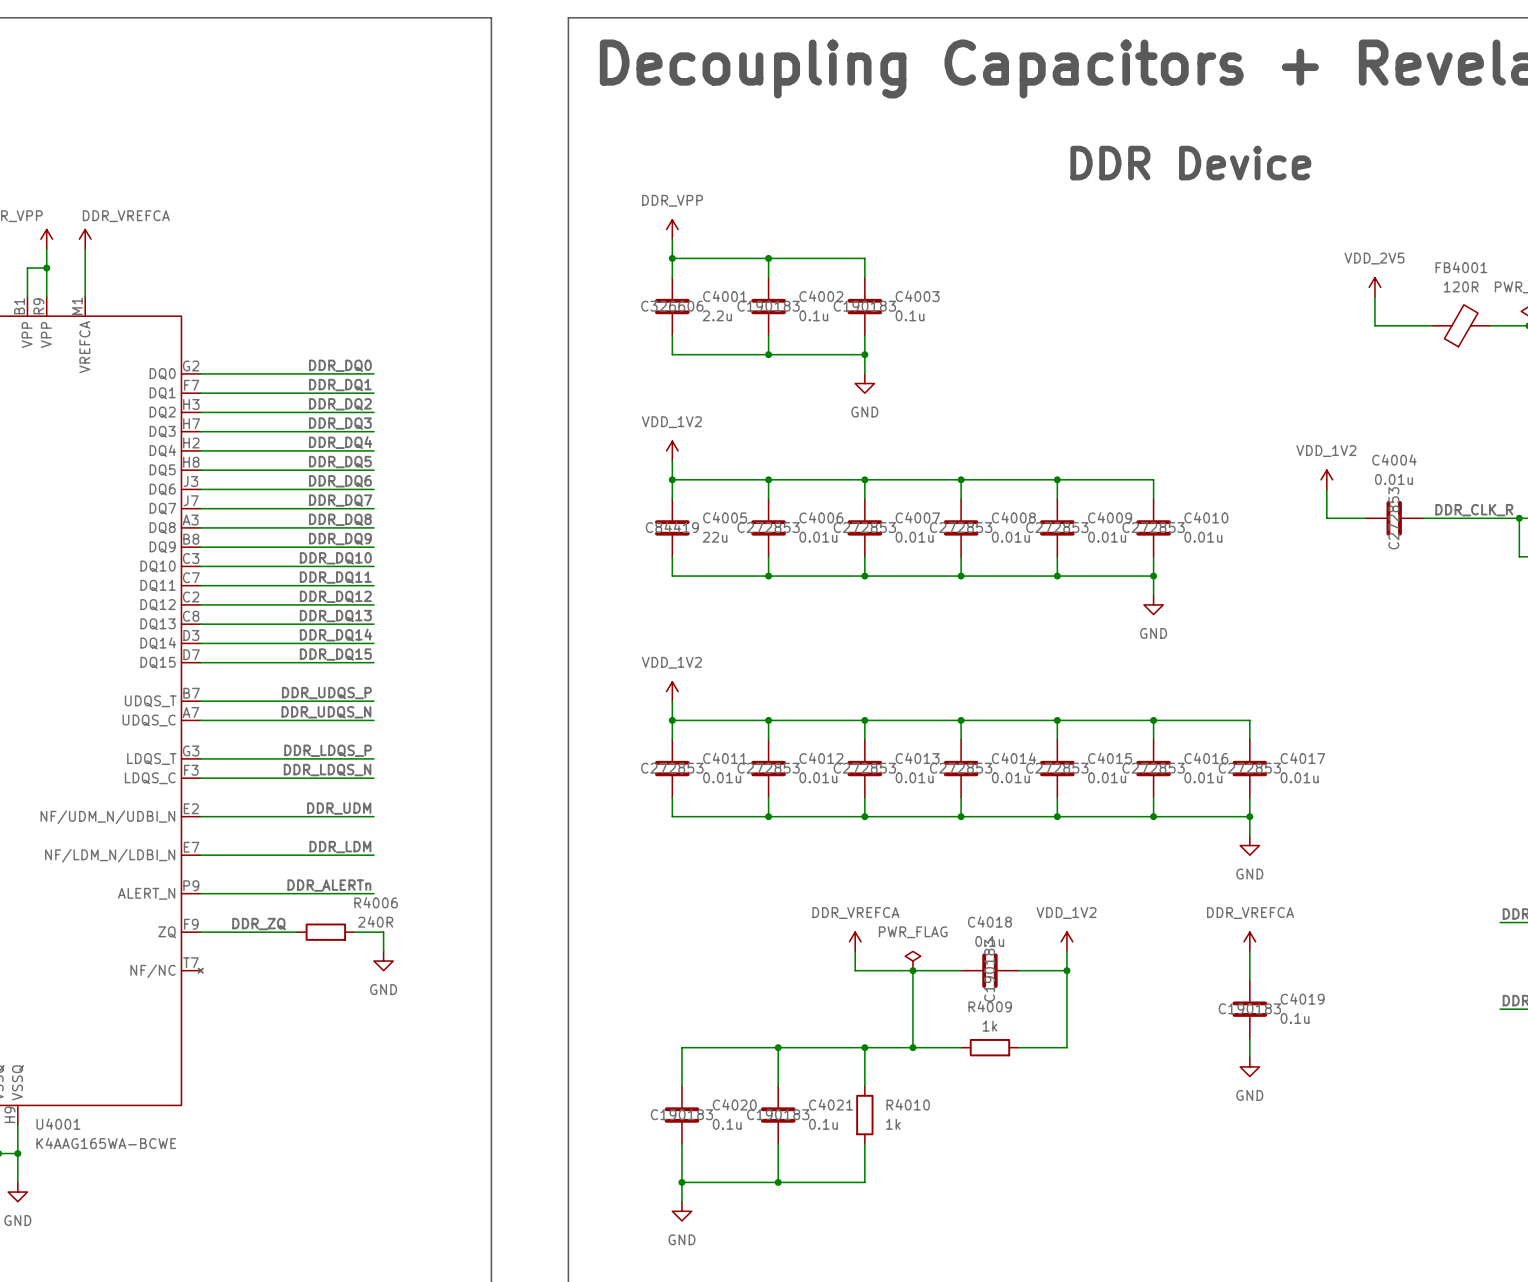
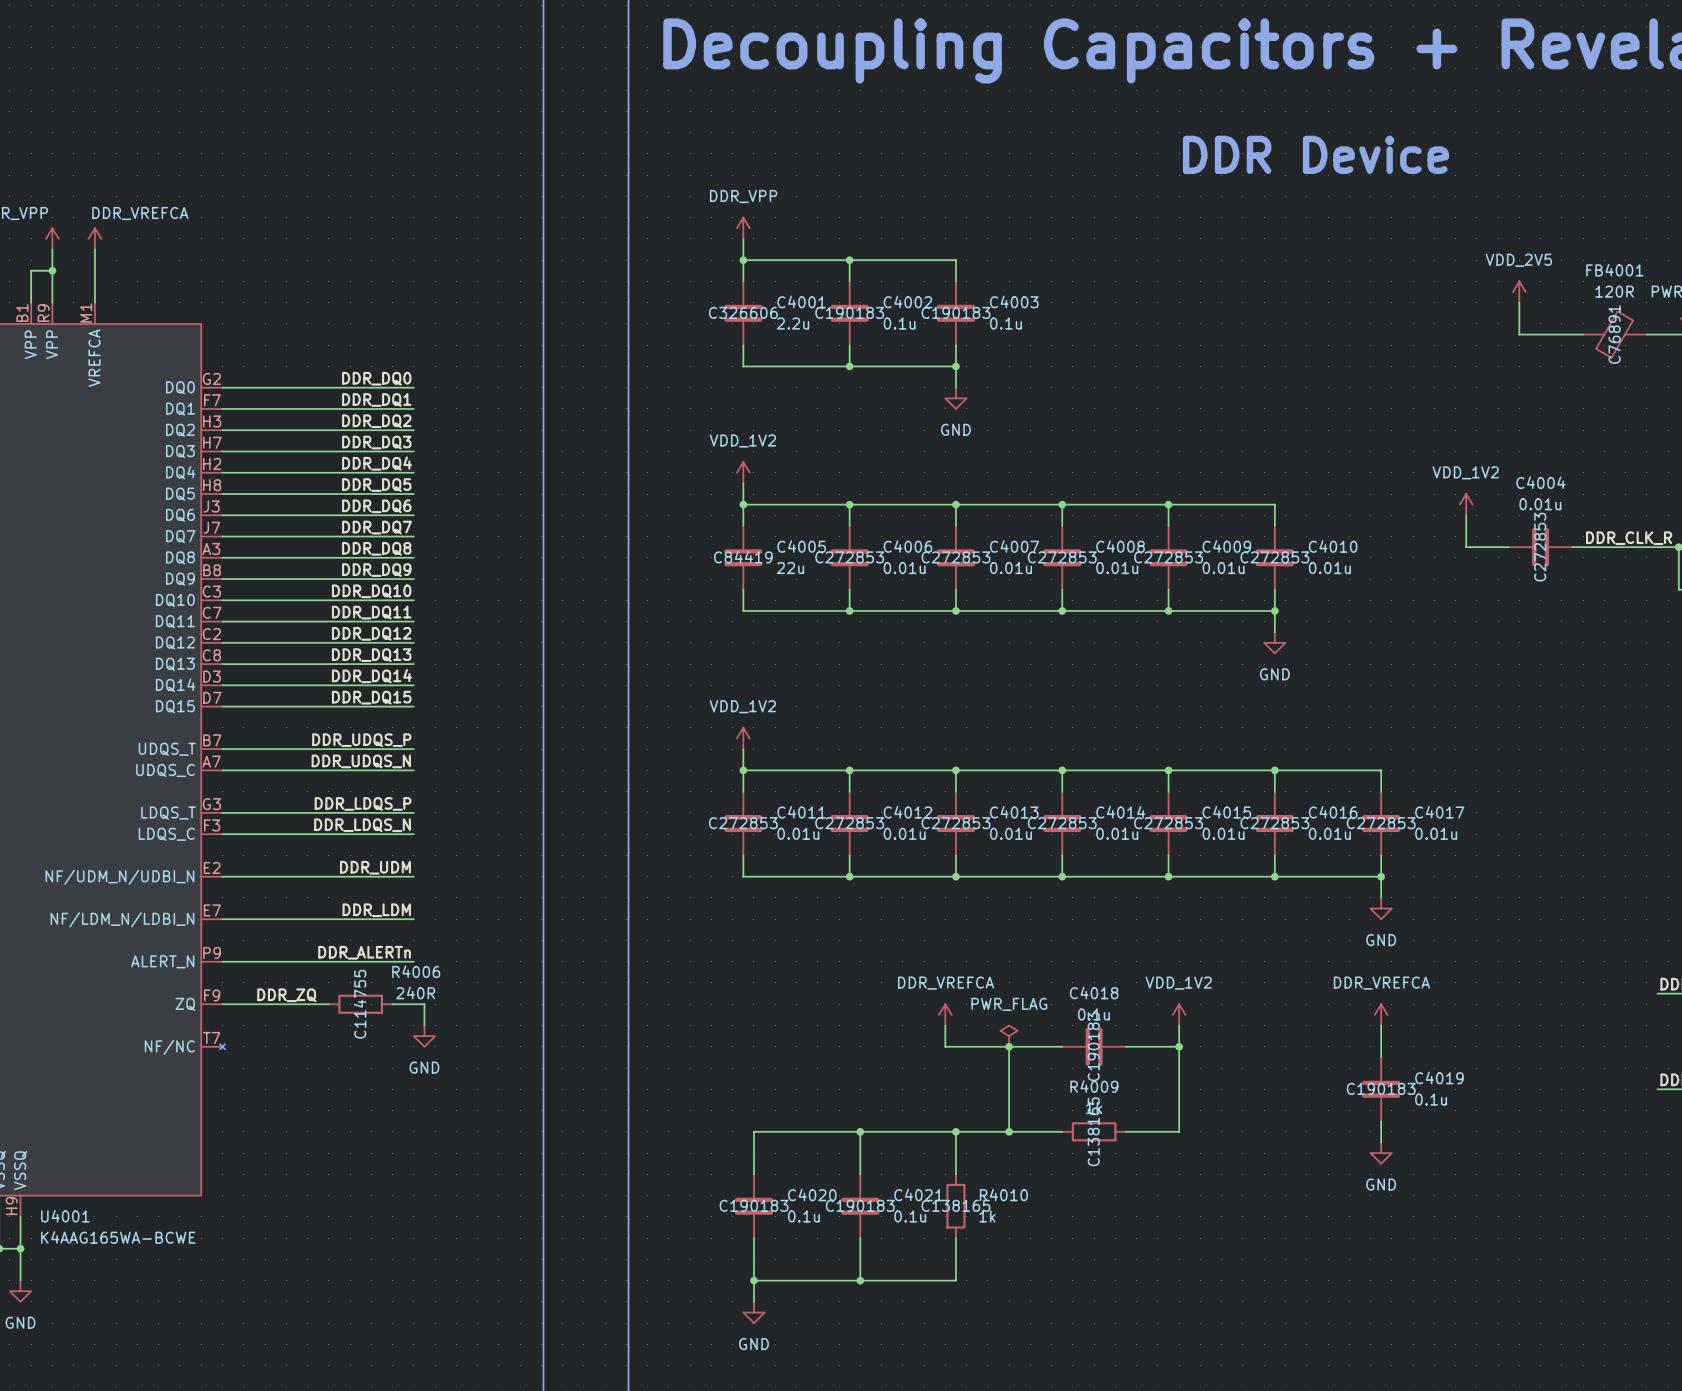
FB4001 text: none -> C76891 (1614, 334)
R4006 text: none -> C114755 (360, 1004)
R4009 text: none -> C138165 (1093, 1131)
R4010 text: none -> C138165 (955, 1205)

